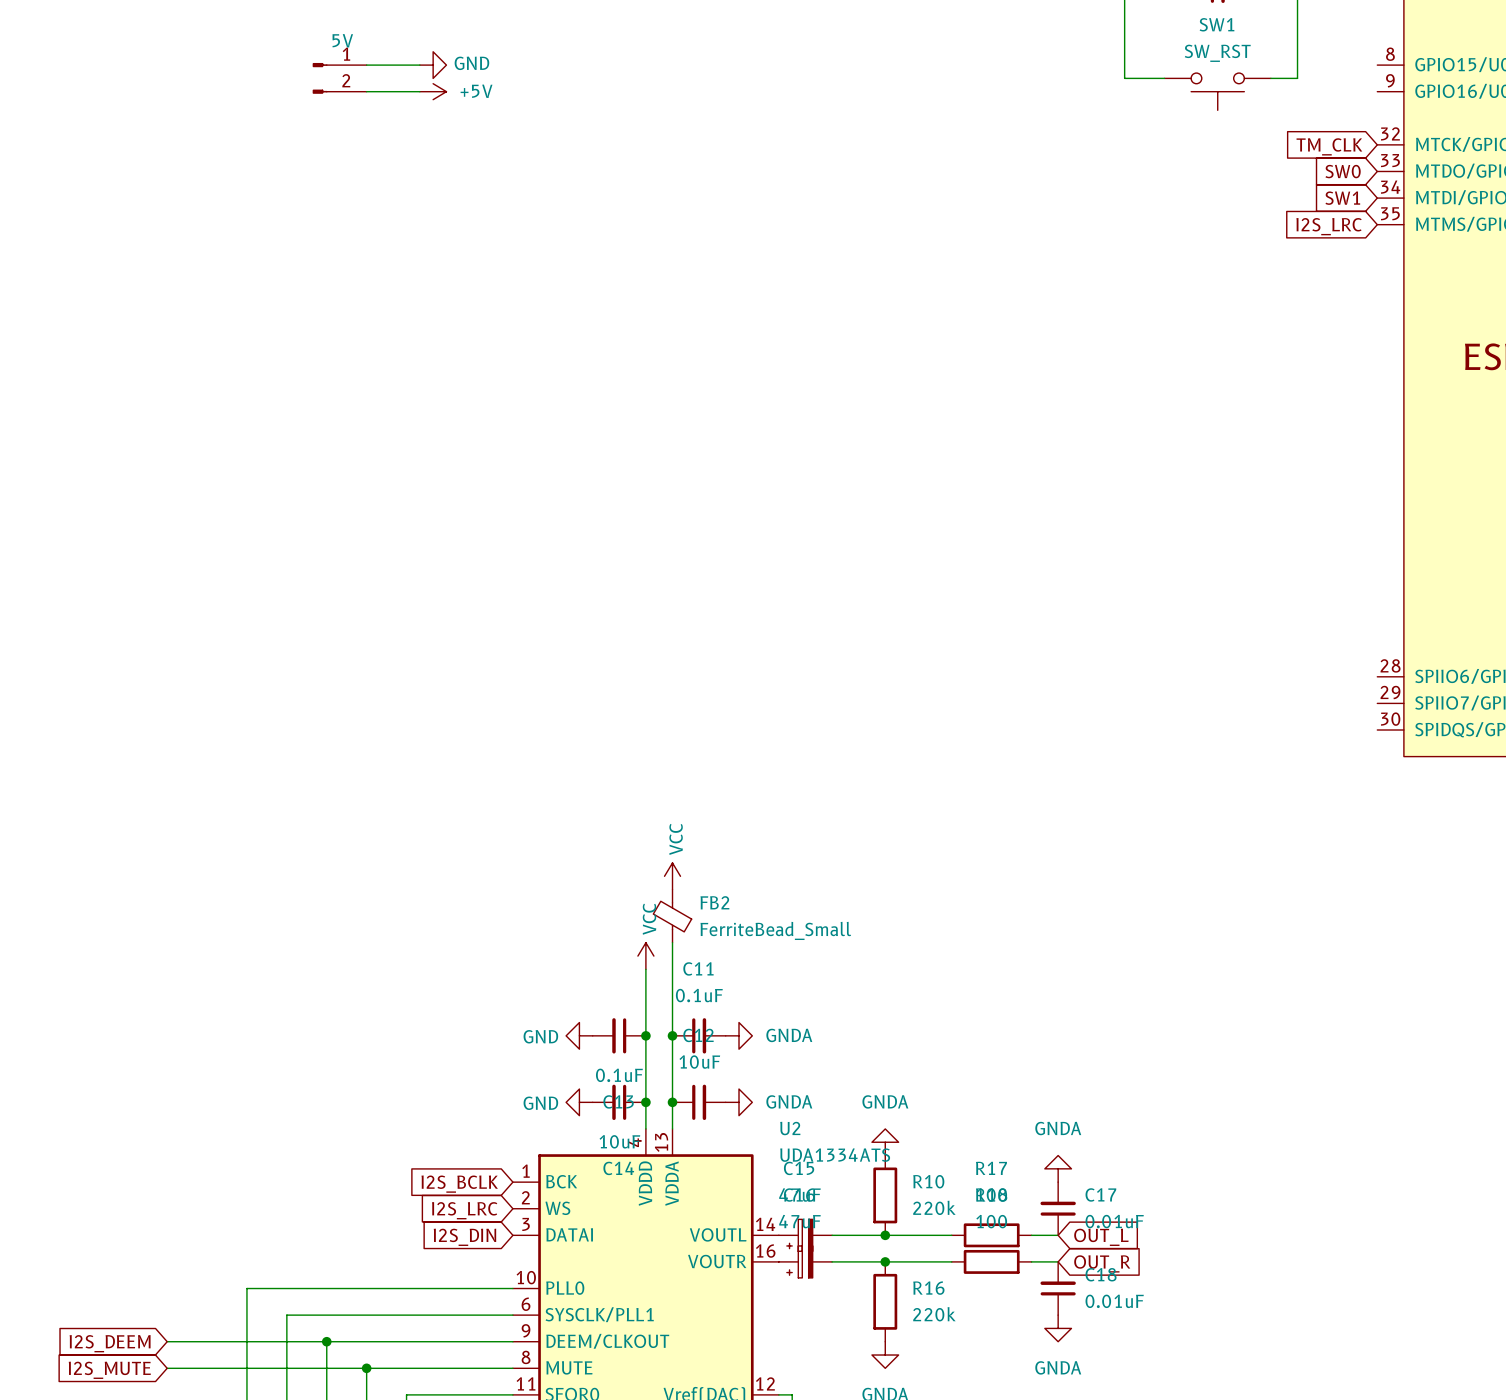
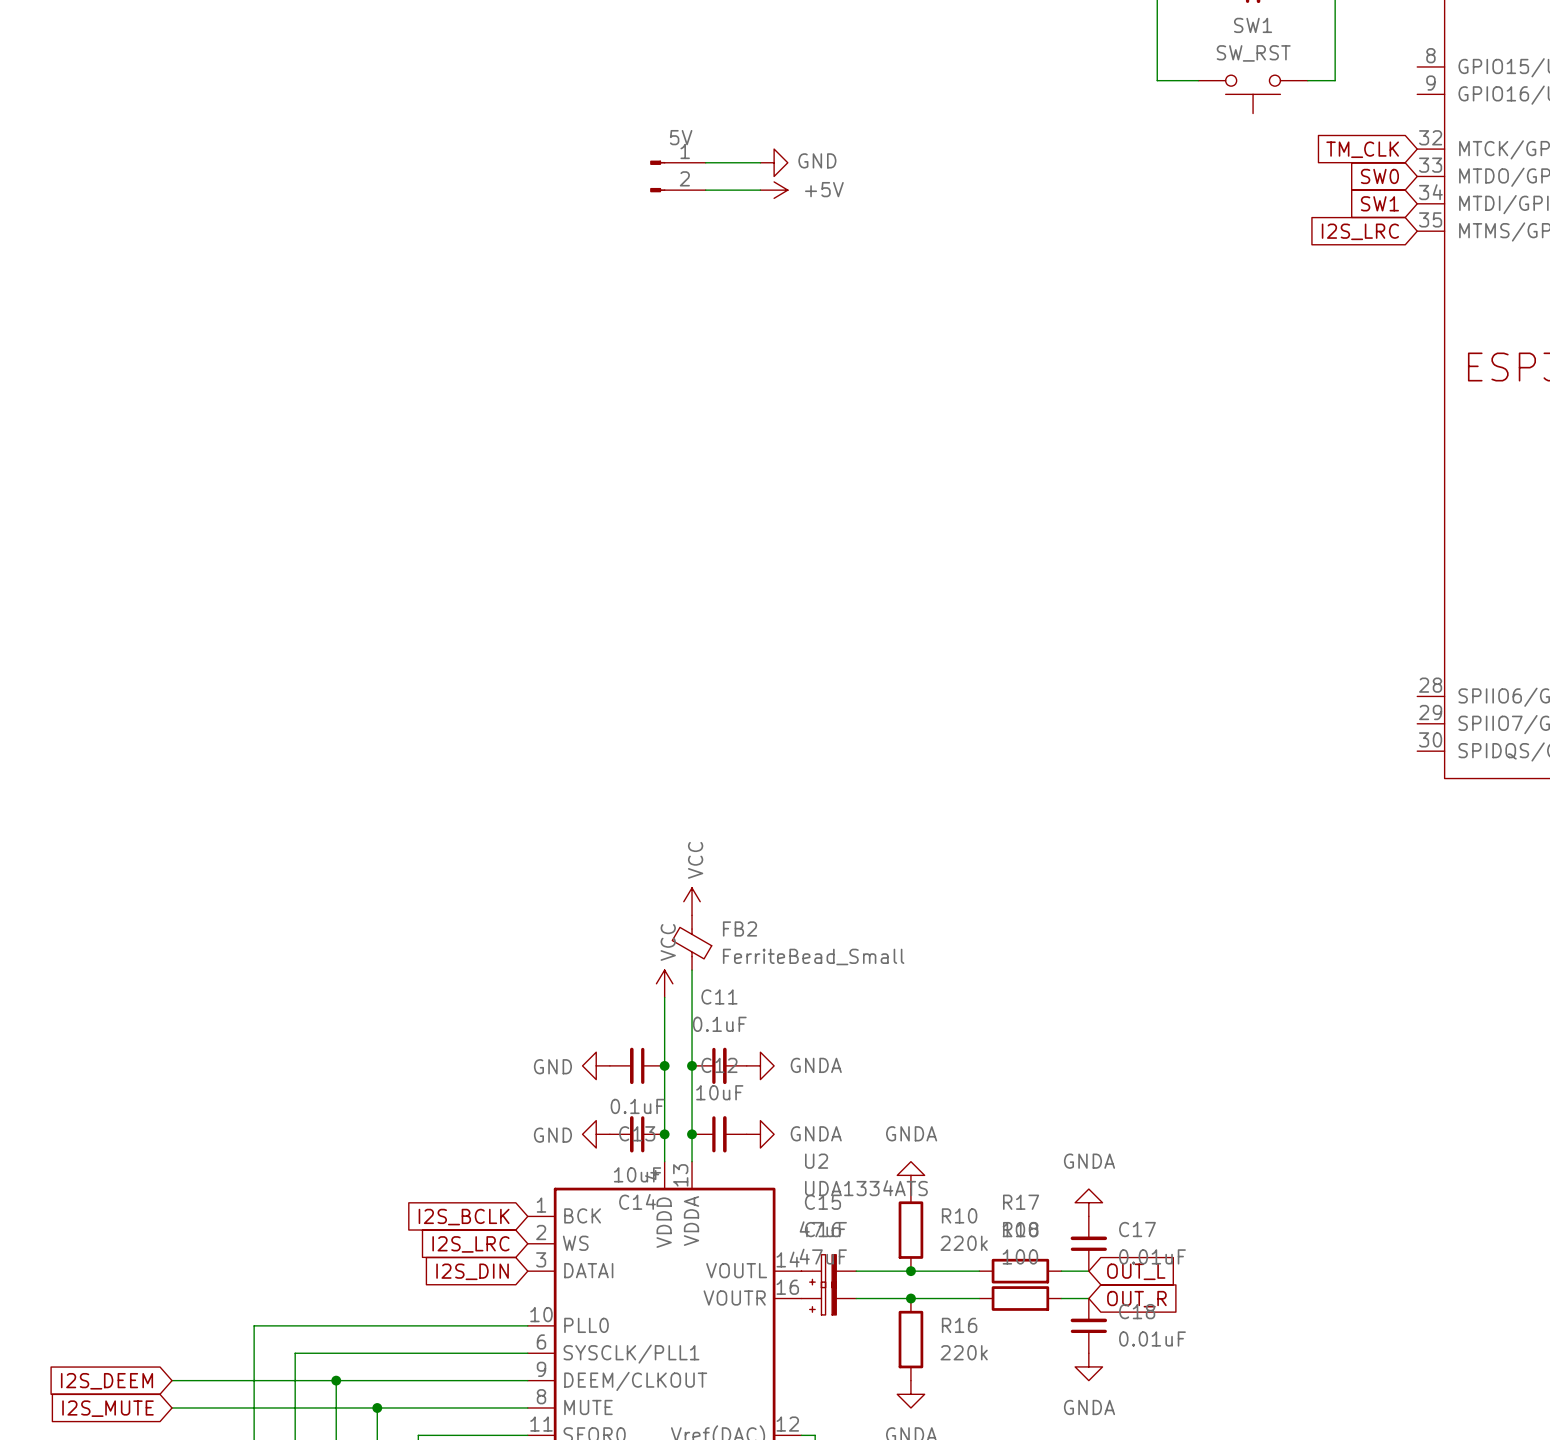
wire: (366, 65) (419, 65) -> none
power symbol: GND (433, 65) -> none
part: 5V (339, 78) -> none
wire: (366, 91) (419, 91) -> none
power symbol: +5V (433, 91) -> none
wire: none -> (705, 162) (760, 162)
power symbol: none -> GND (774, 162)
part: none -> 5V (677, 176)
wire: none -> (705, 190) (760, 190)
power symbol: none -> +5V (774, 190)

